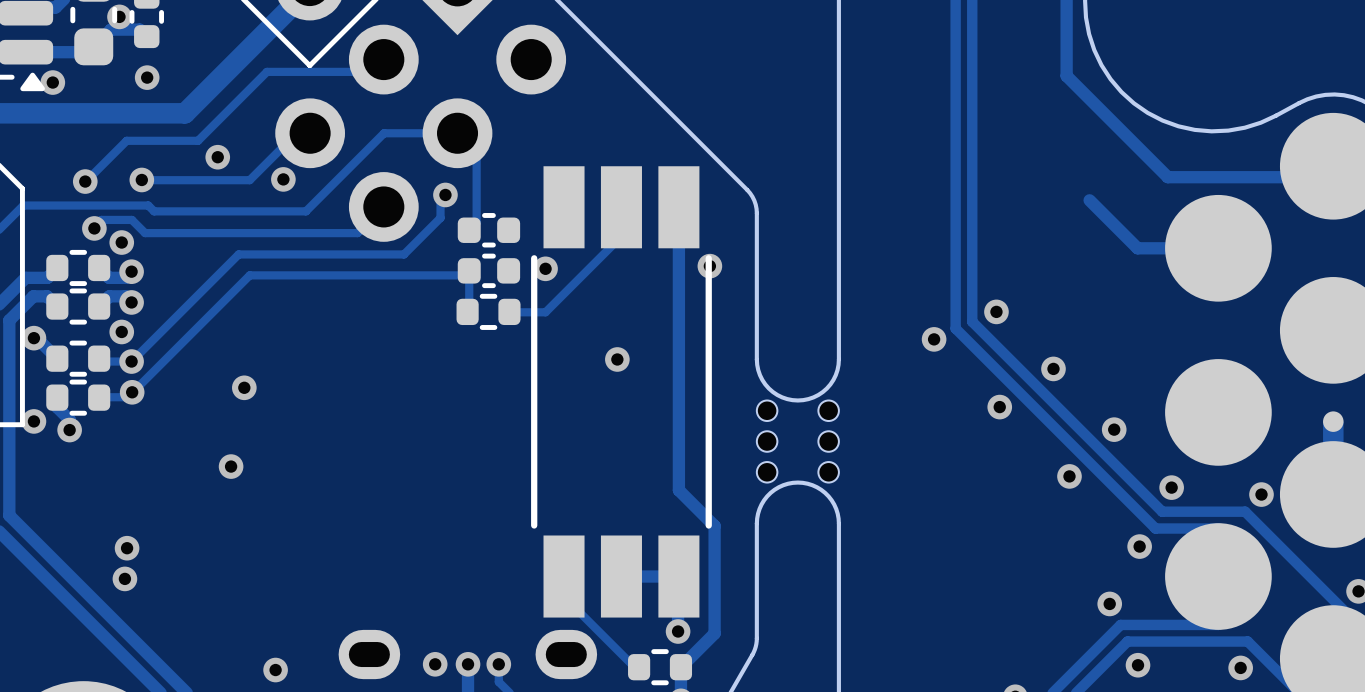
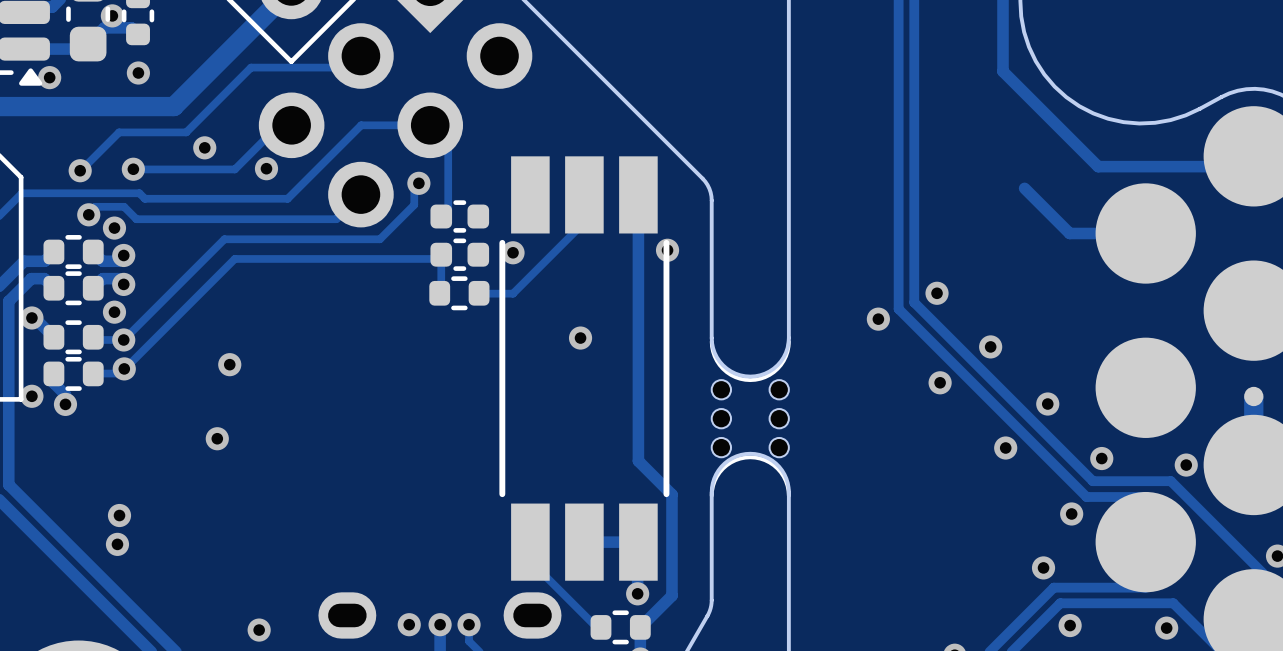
part footprint: [756, 400, 839, 483] -> [709, 339, 791, 498]

